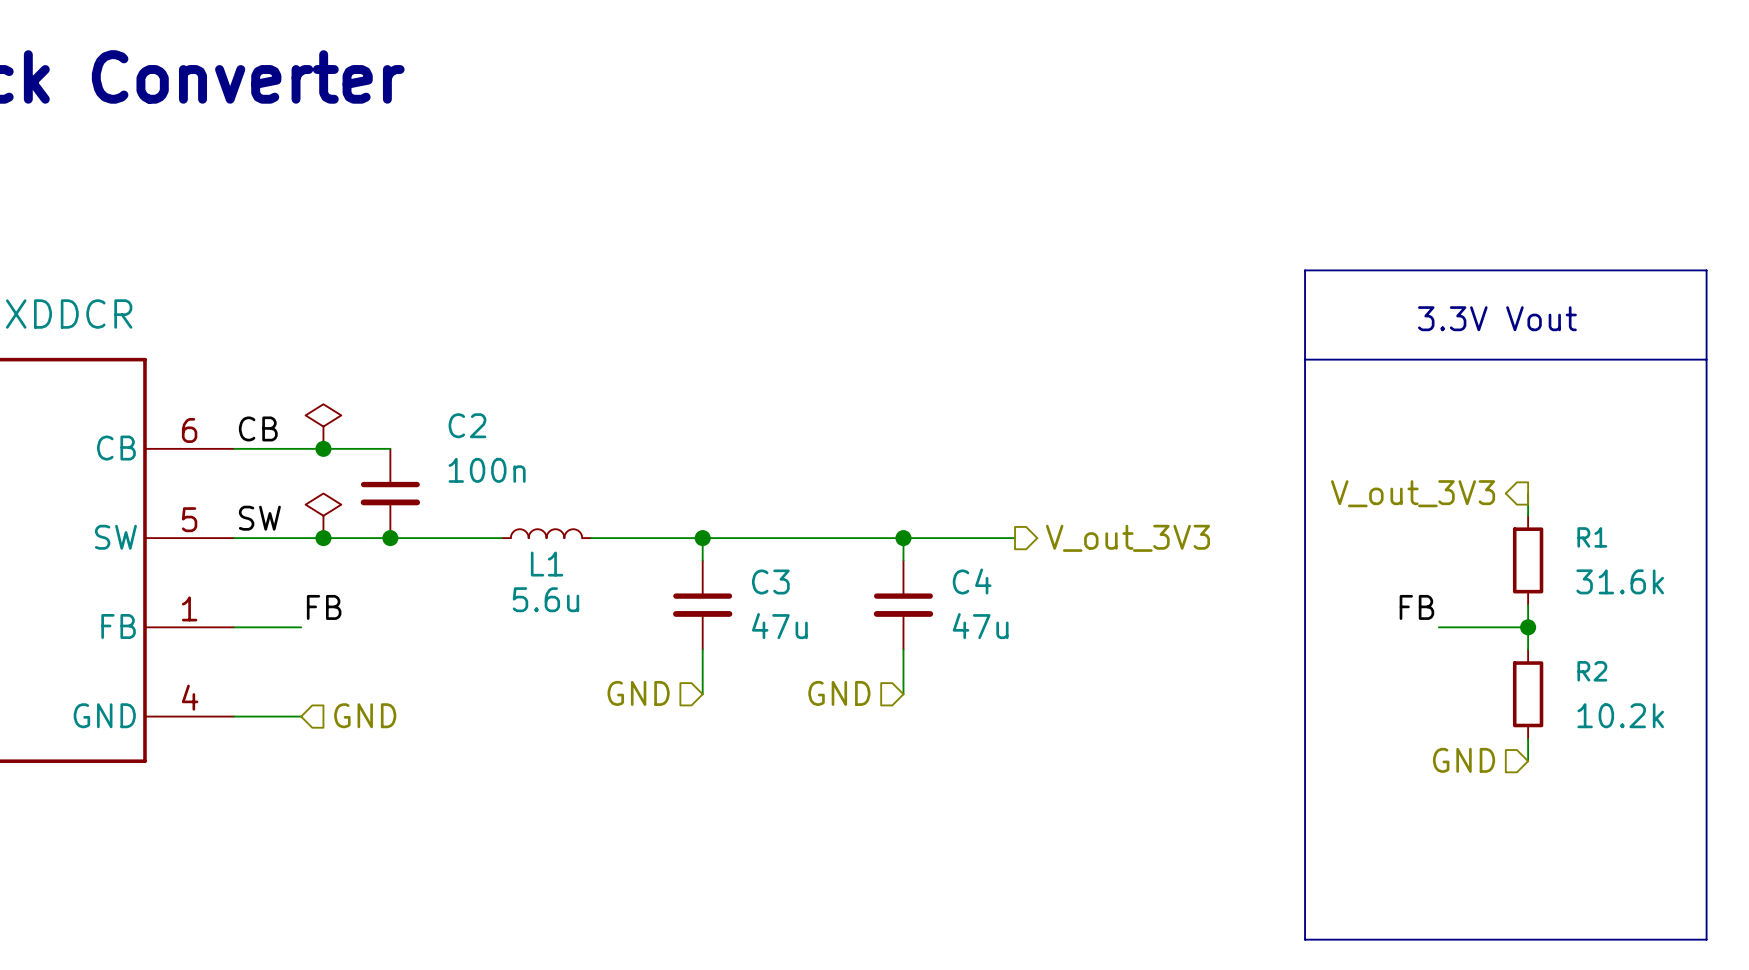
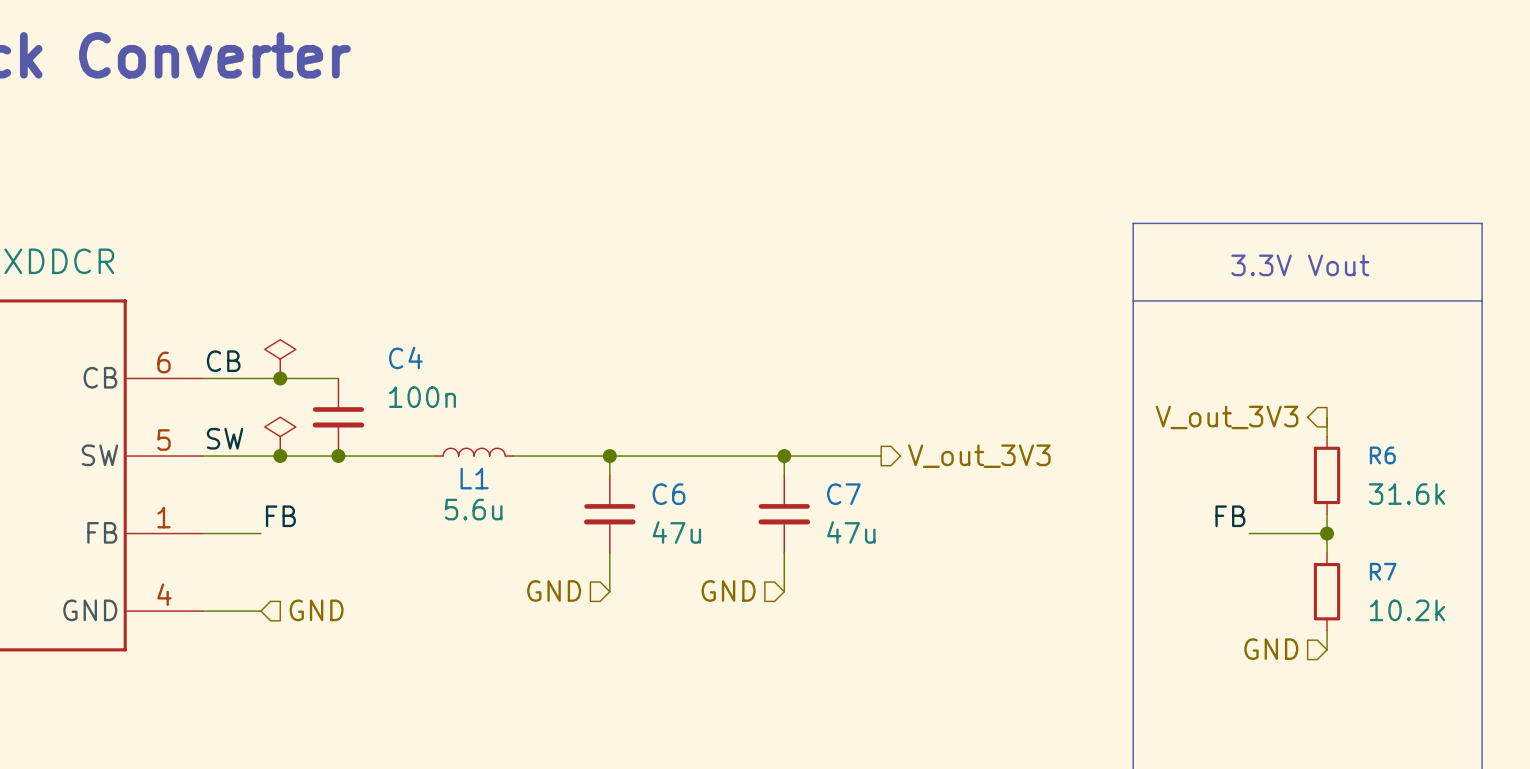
C2 name: C2 (467, 425) -> C4 (405, 357)
R1 name: R1 (1592, 537) -> R6 (1382, 455)
C3 name: C3 (770, 581) -> C6 (669, 494)
C4 name: C4 (972, 581) -> C7 (843, 494)
R2 name: R2 (1592, 671) -> R7 (1383, 571)

